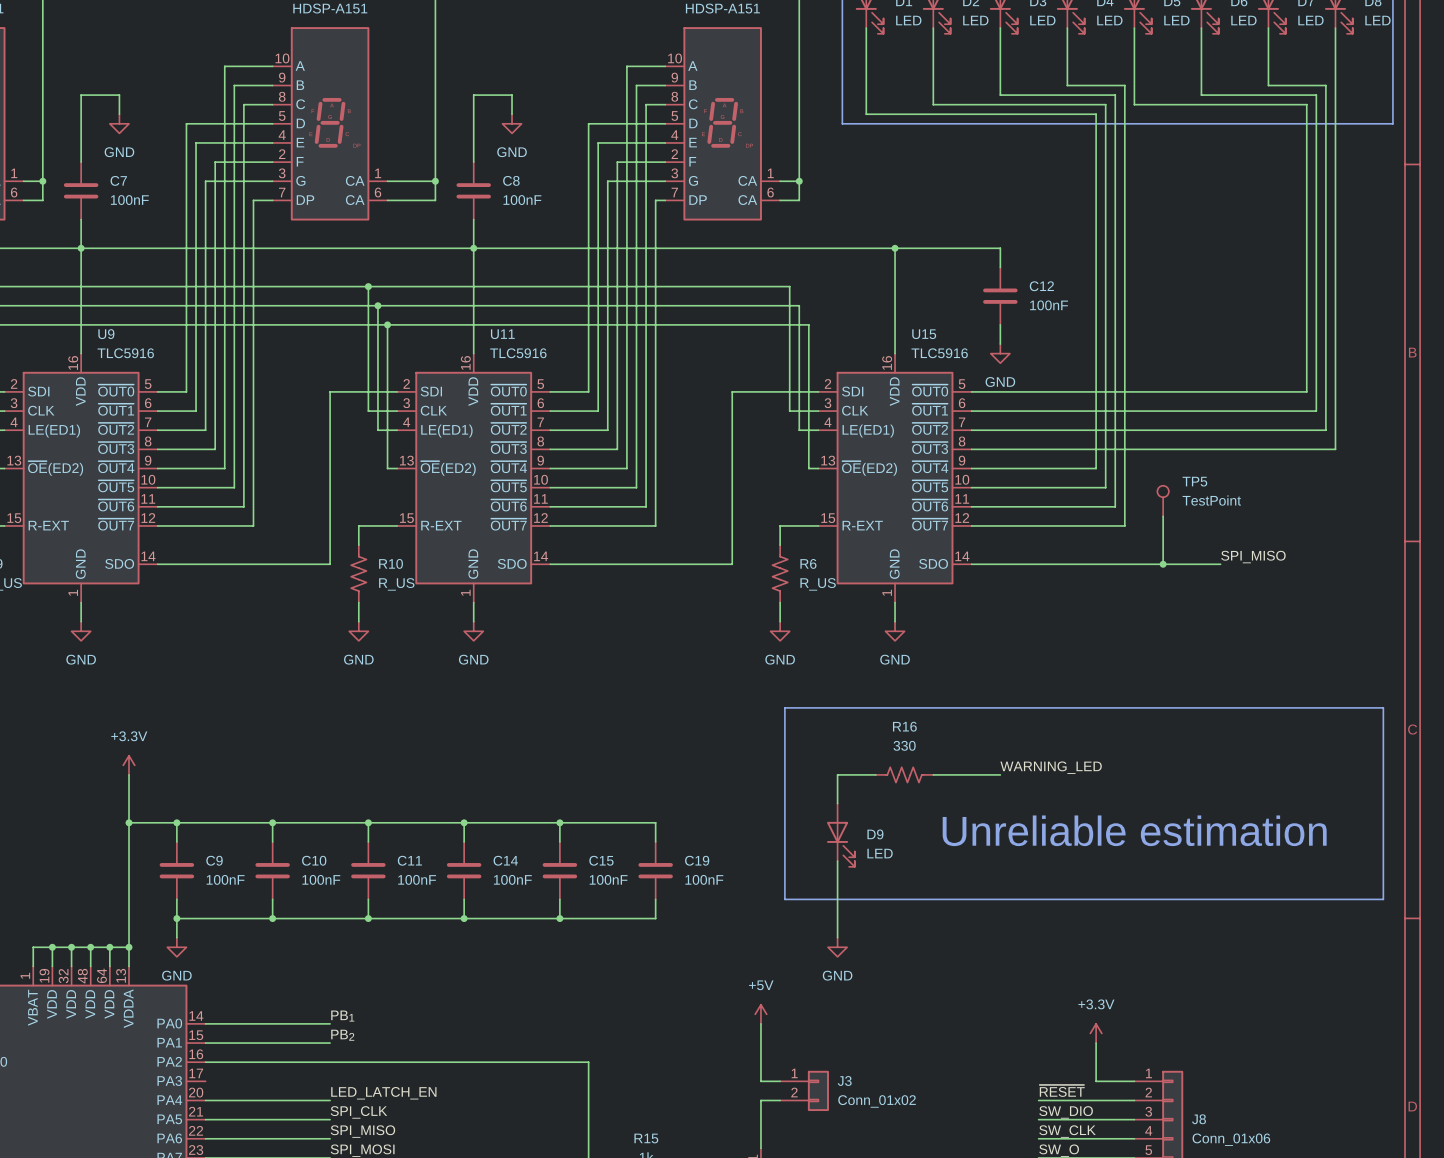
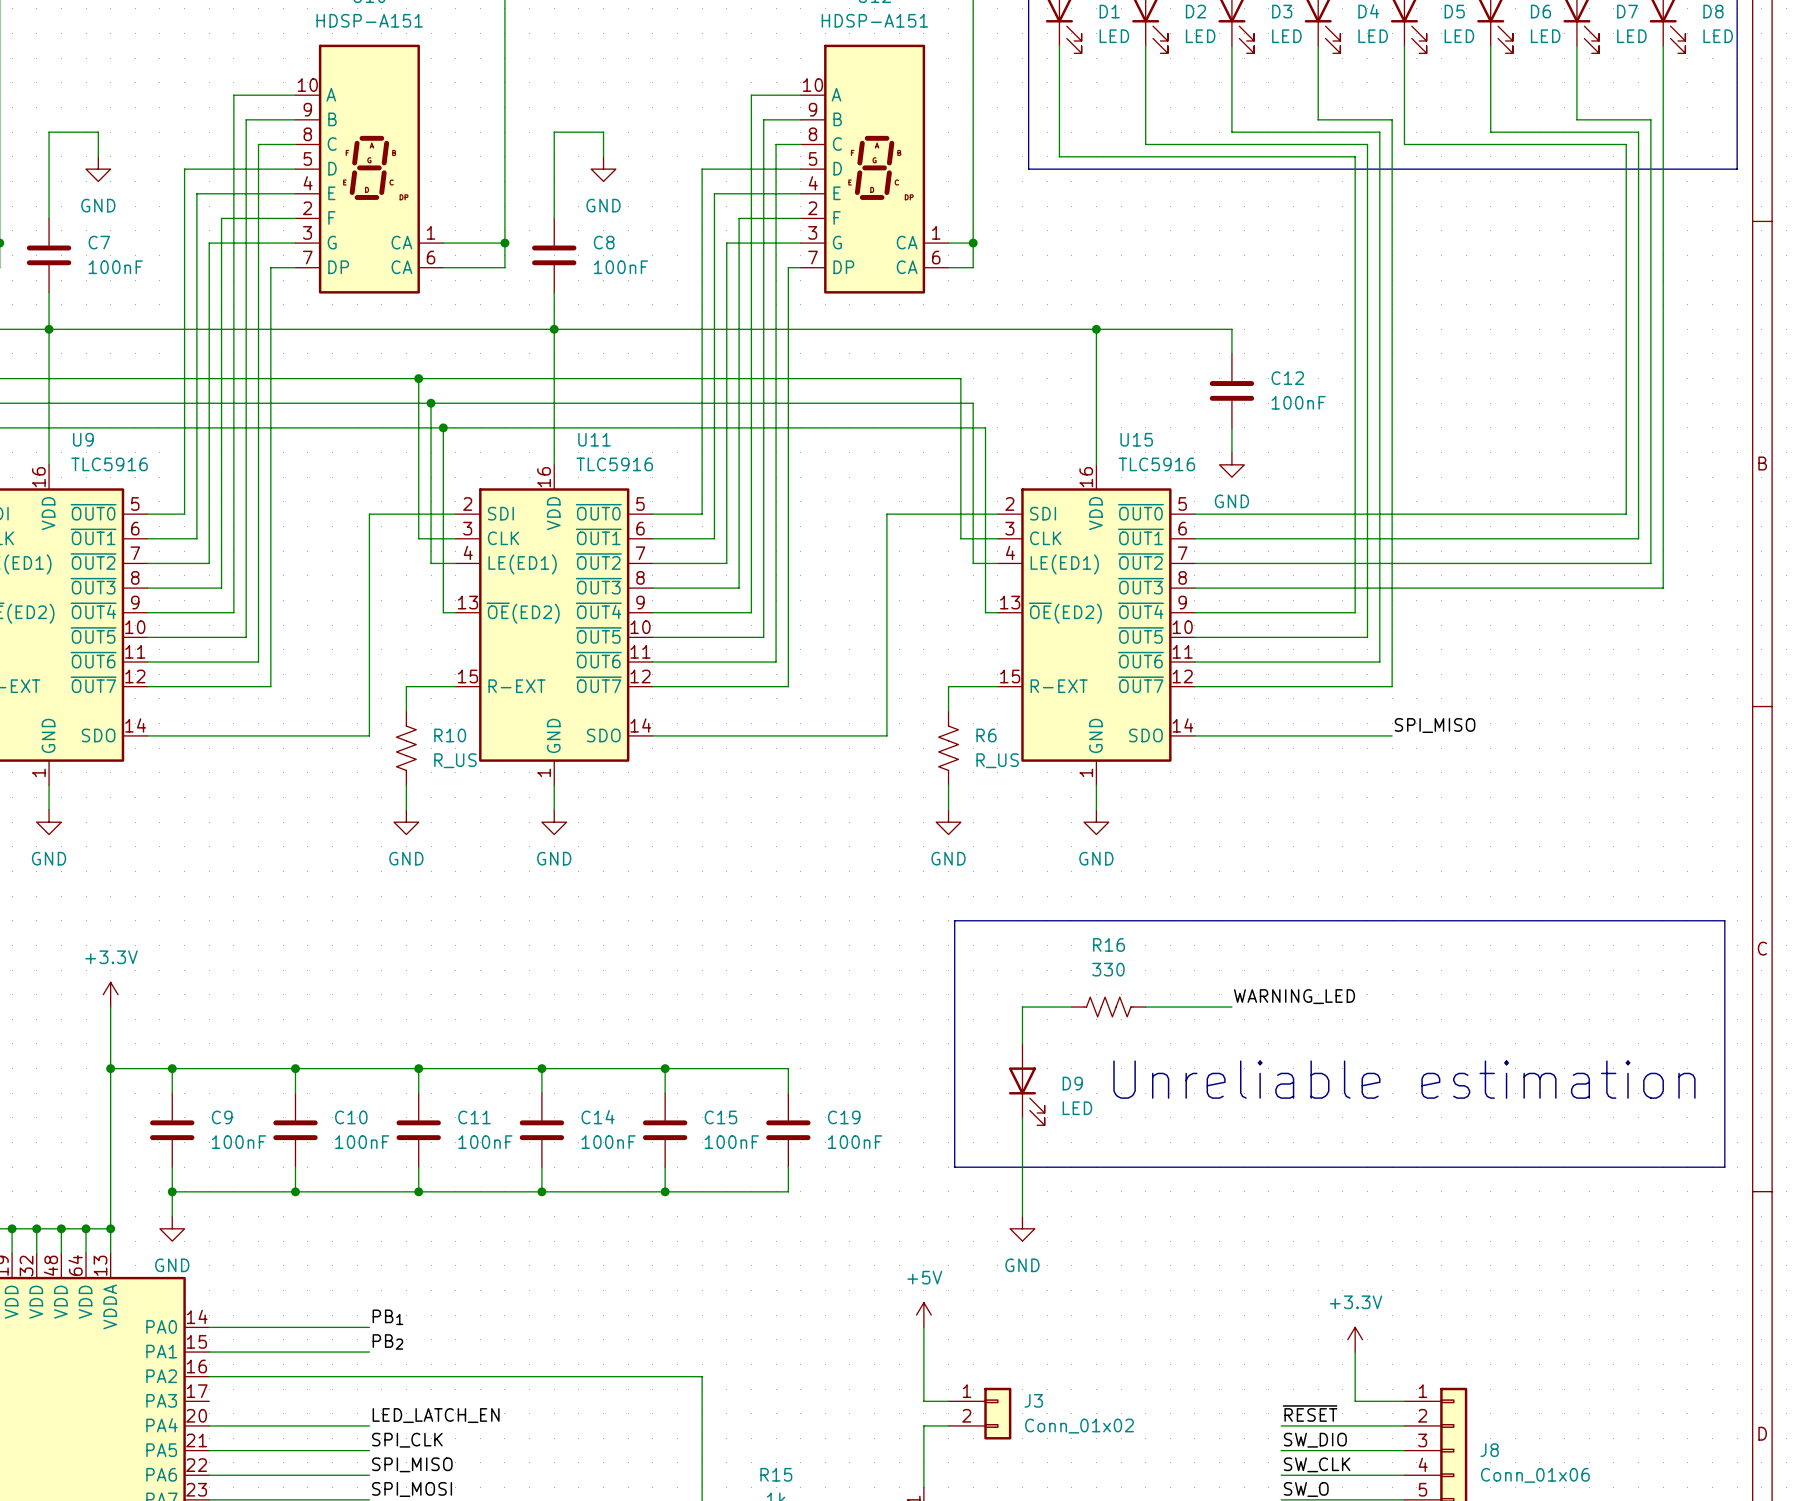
TP5: TestPoint (1163, 501) -> none
wire: (1163, 516) (1163, 564) -> none
label position: SPI_MISO (1253, 557) -> SPI_MISO (1435, 725)
wire: (1124, 564) (1220, 564) -> none
junction: (1163, 564) -> none

